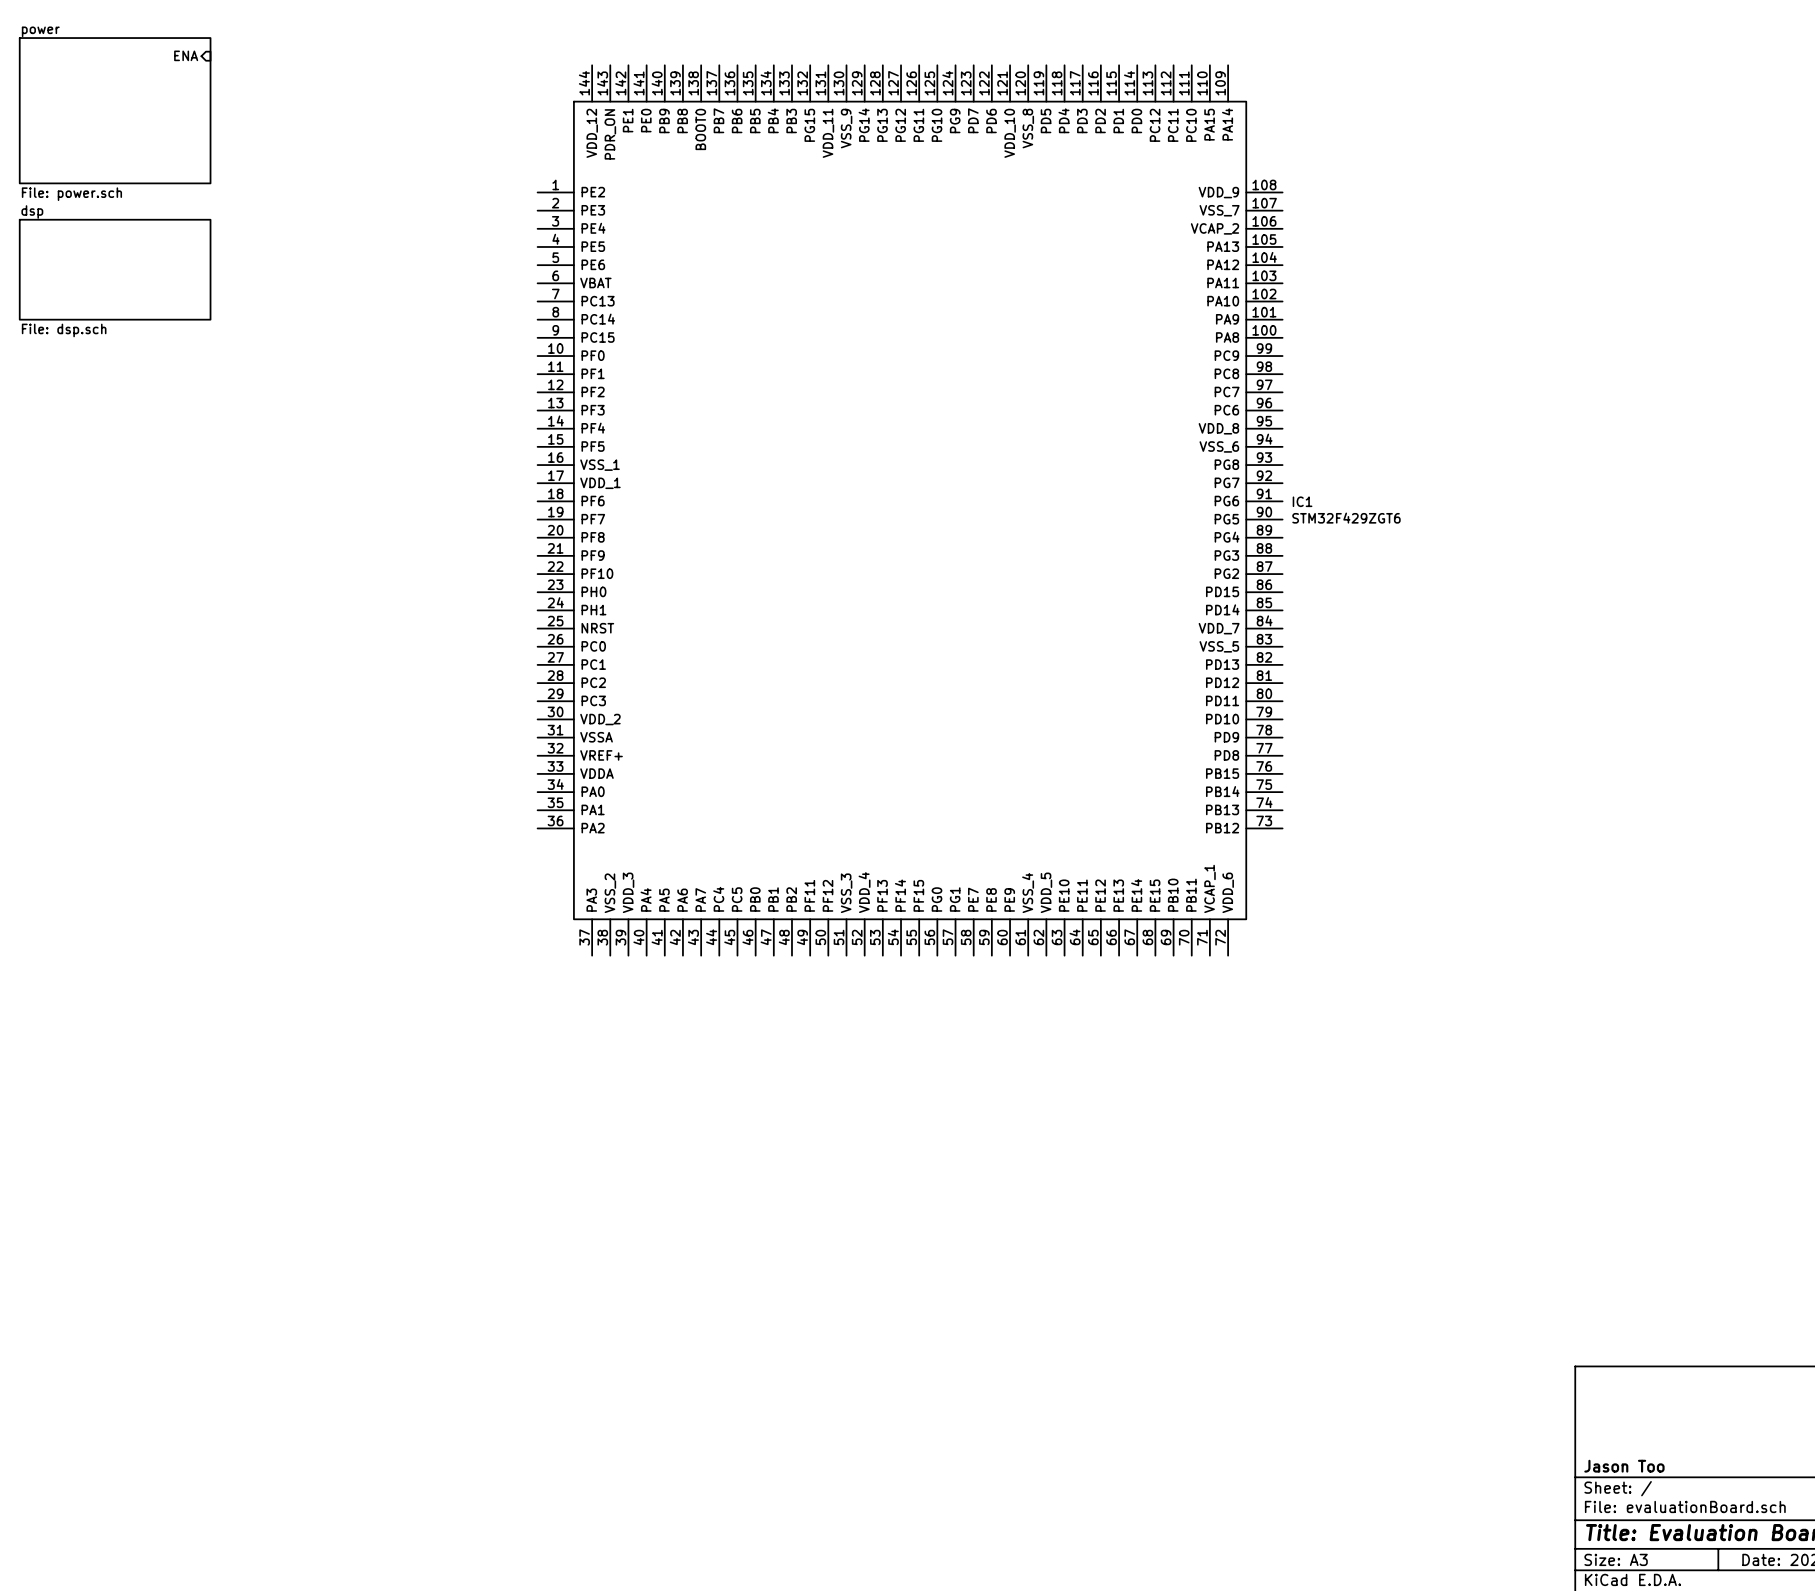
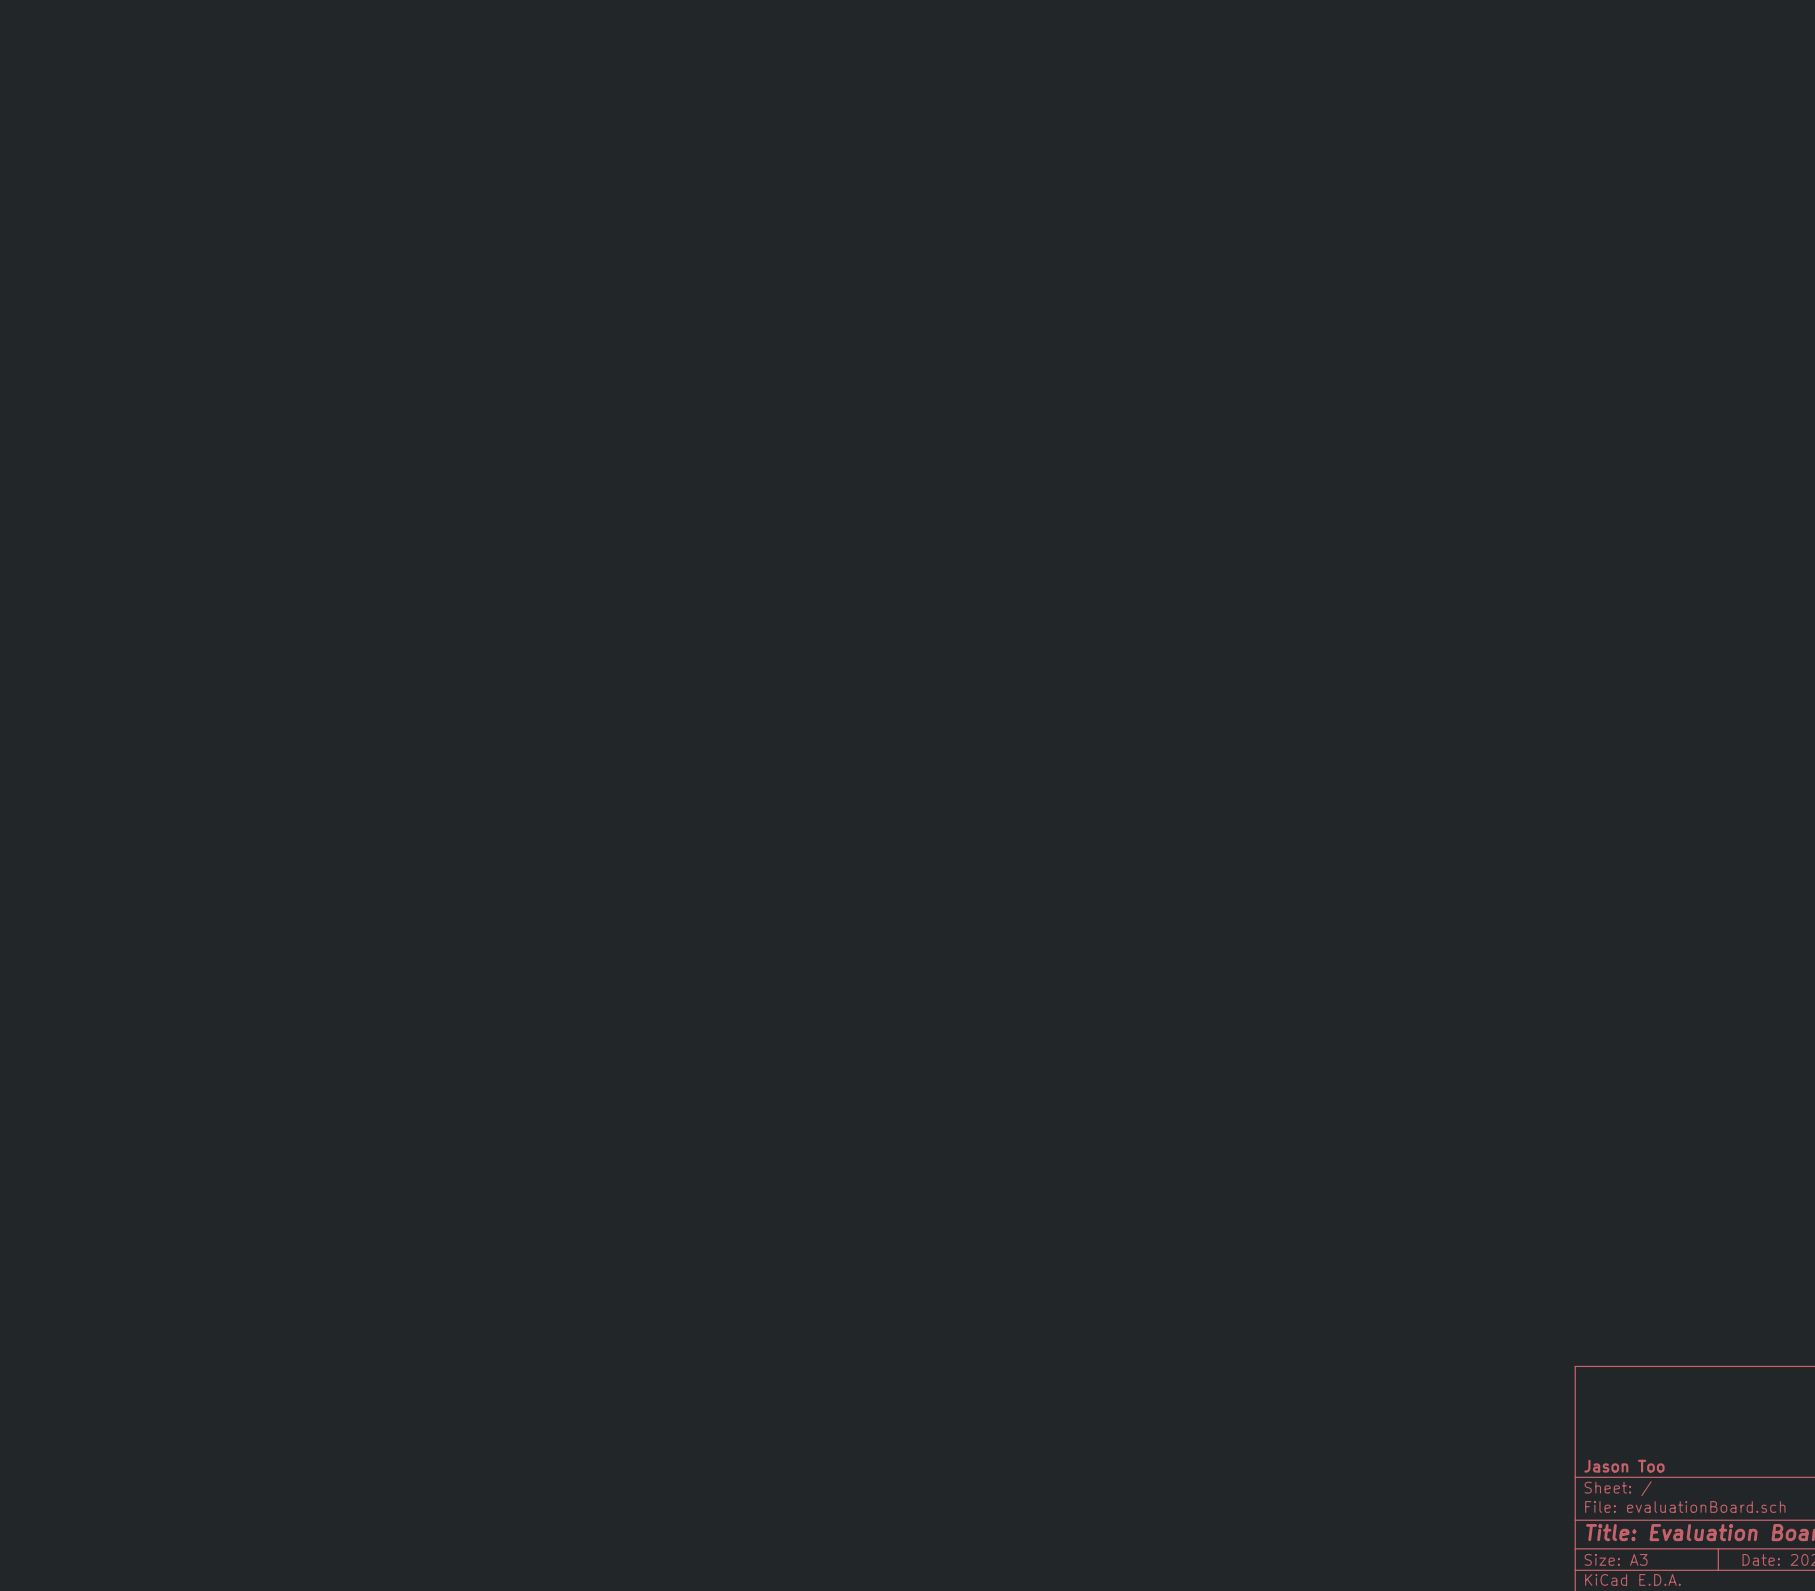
sheet pin: ENA (186, 55) -> none
sheet power: File: power.sch (115, 110) -> none
sheet dsp: File: dsp.sch (115, 269) -> none
IC1: STM32F429ZGT6 (910, 510) -> none

